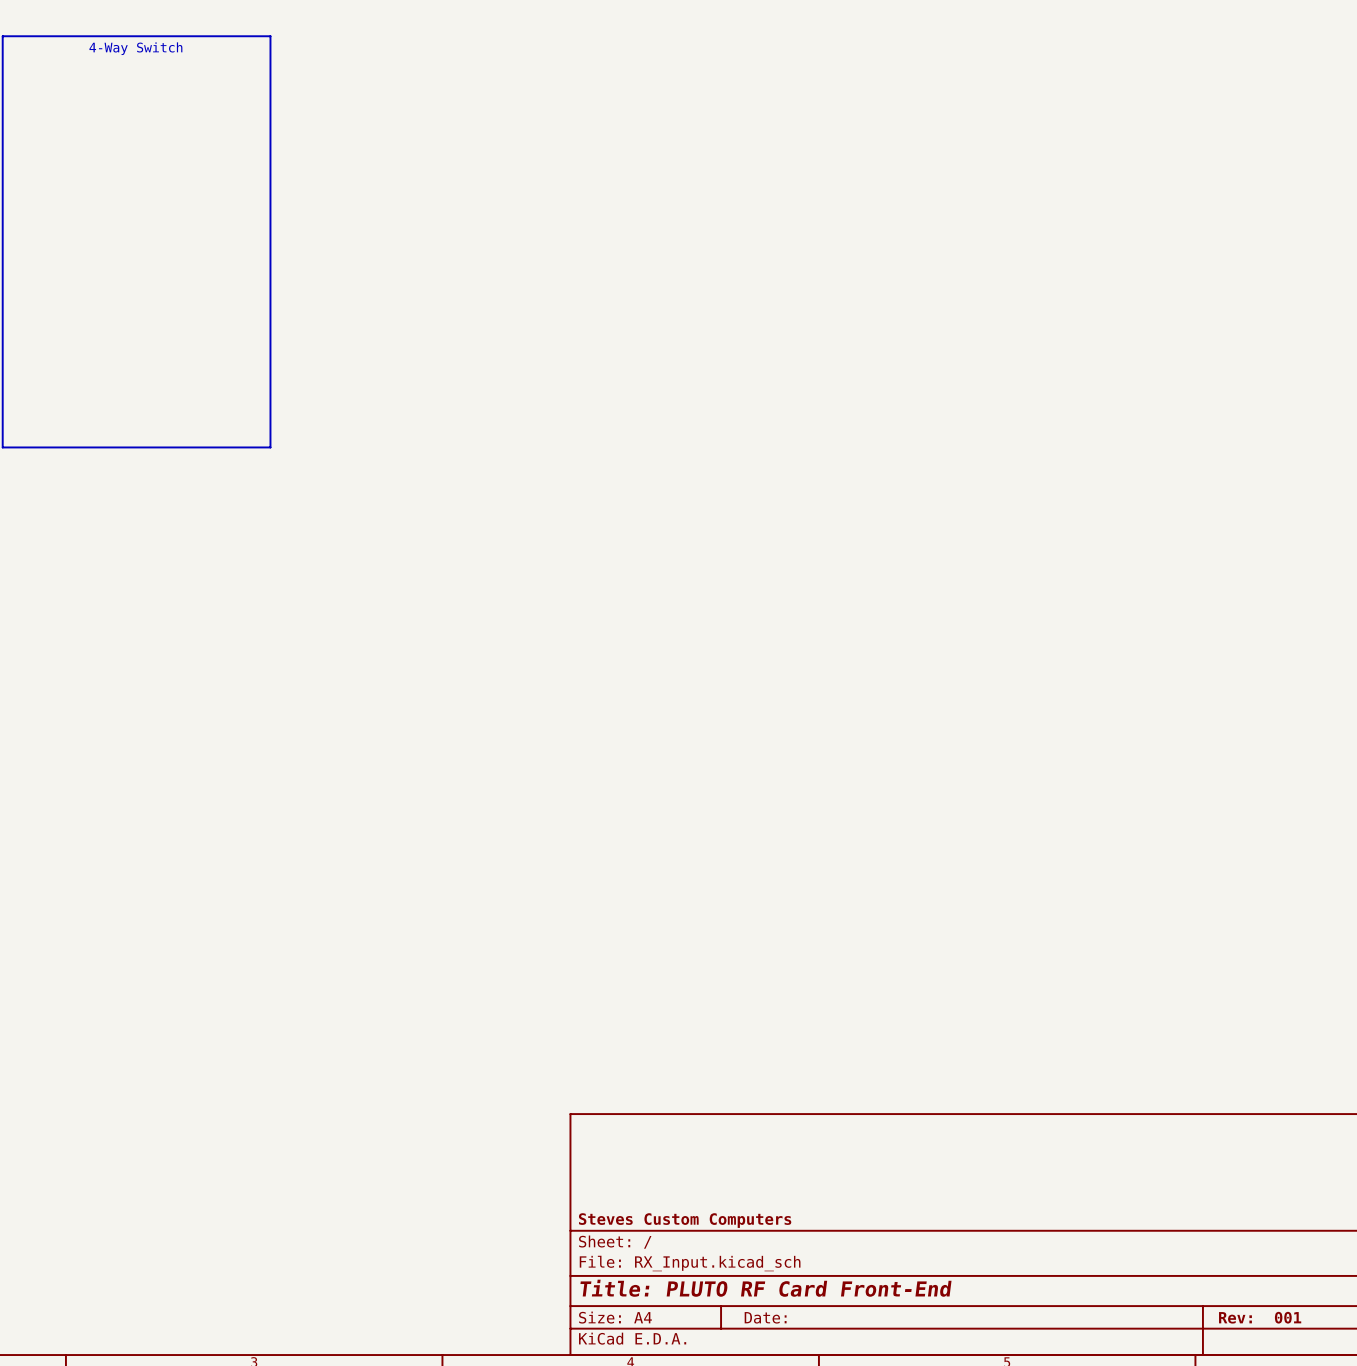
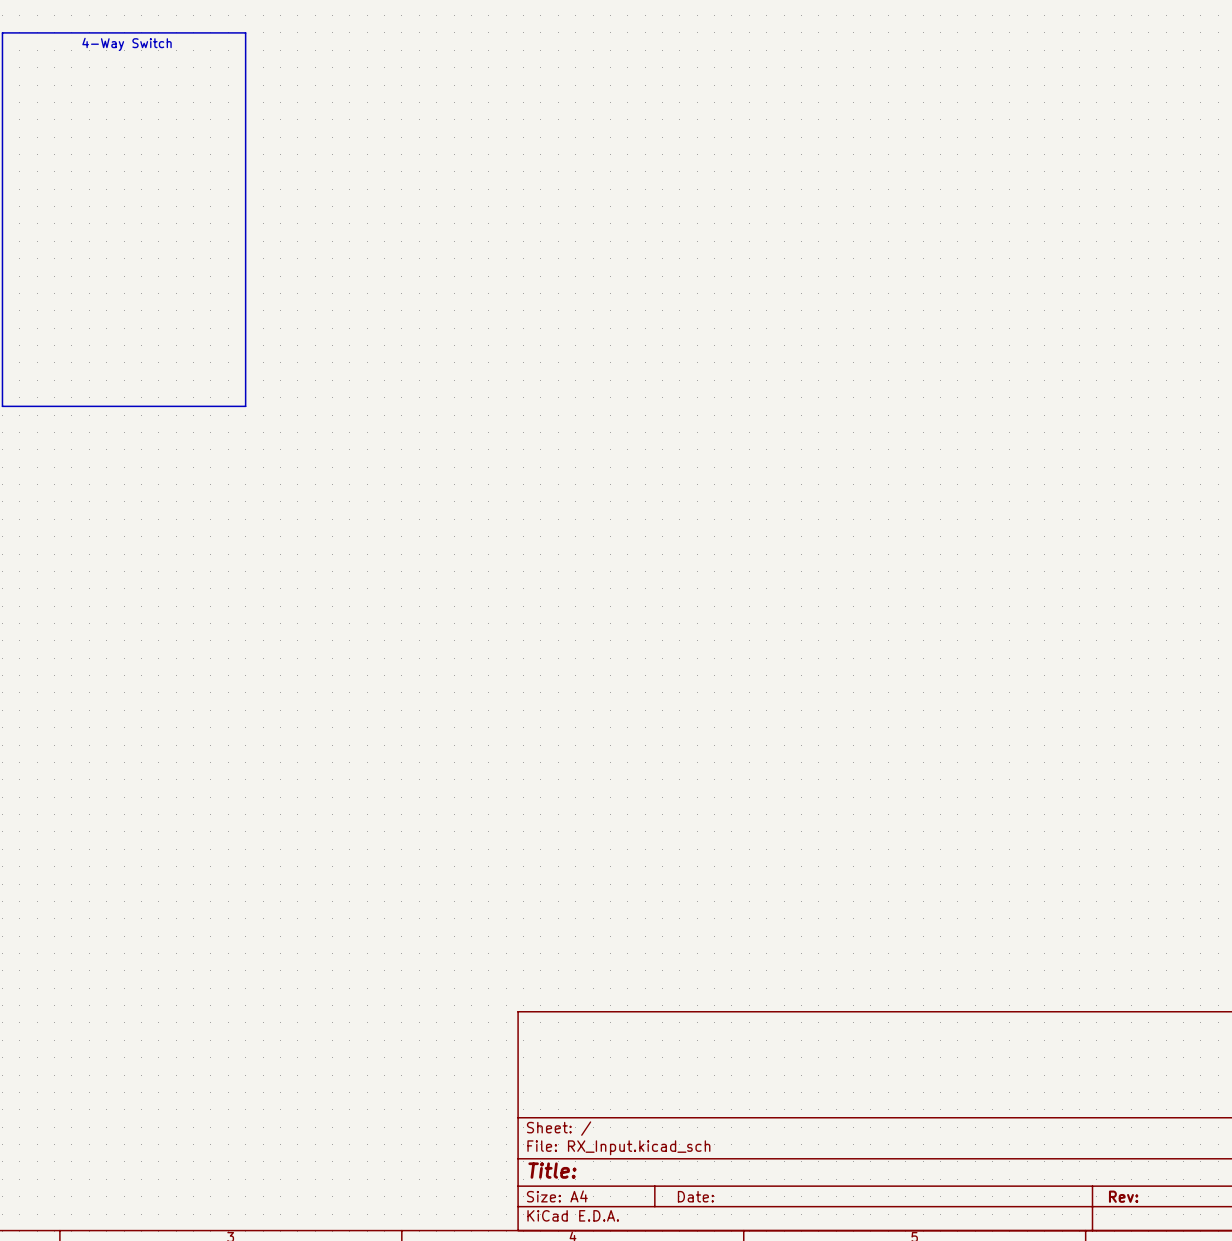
title block: Steves Custom Computers (685, 1220) -> none
title block: Title: PLUTO RF Card Front-End (765, 1288) -> Title: (552, 1170)
title block: Rev: 001 (1260, 1317) -> Rev: (1123, 1196)

